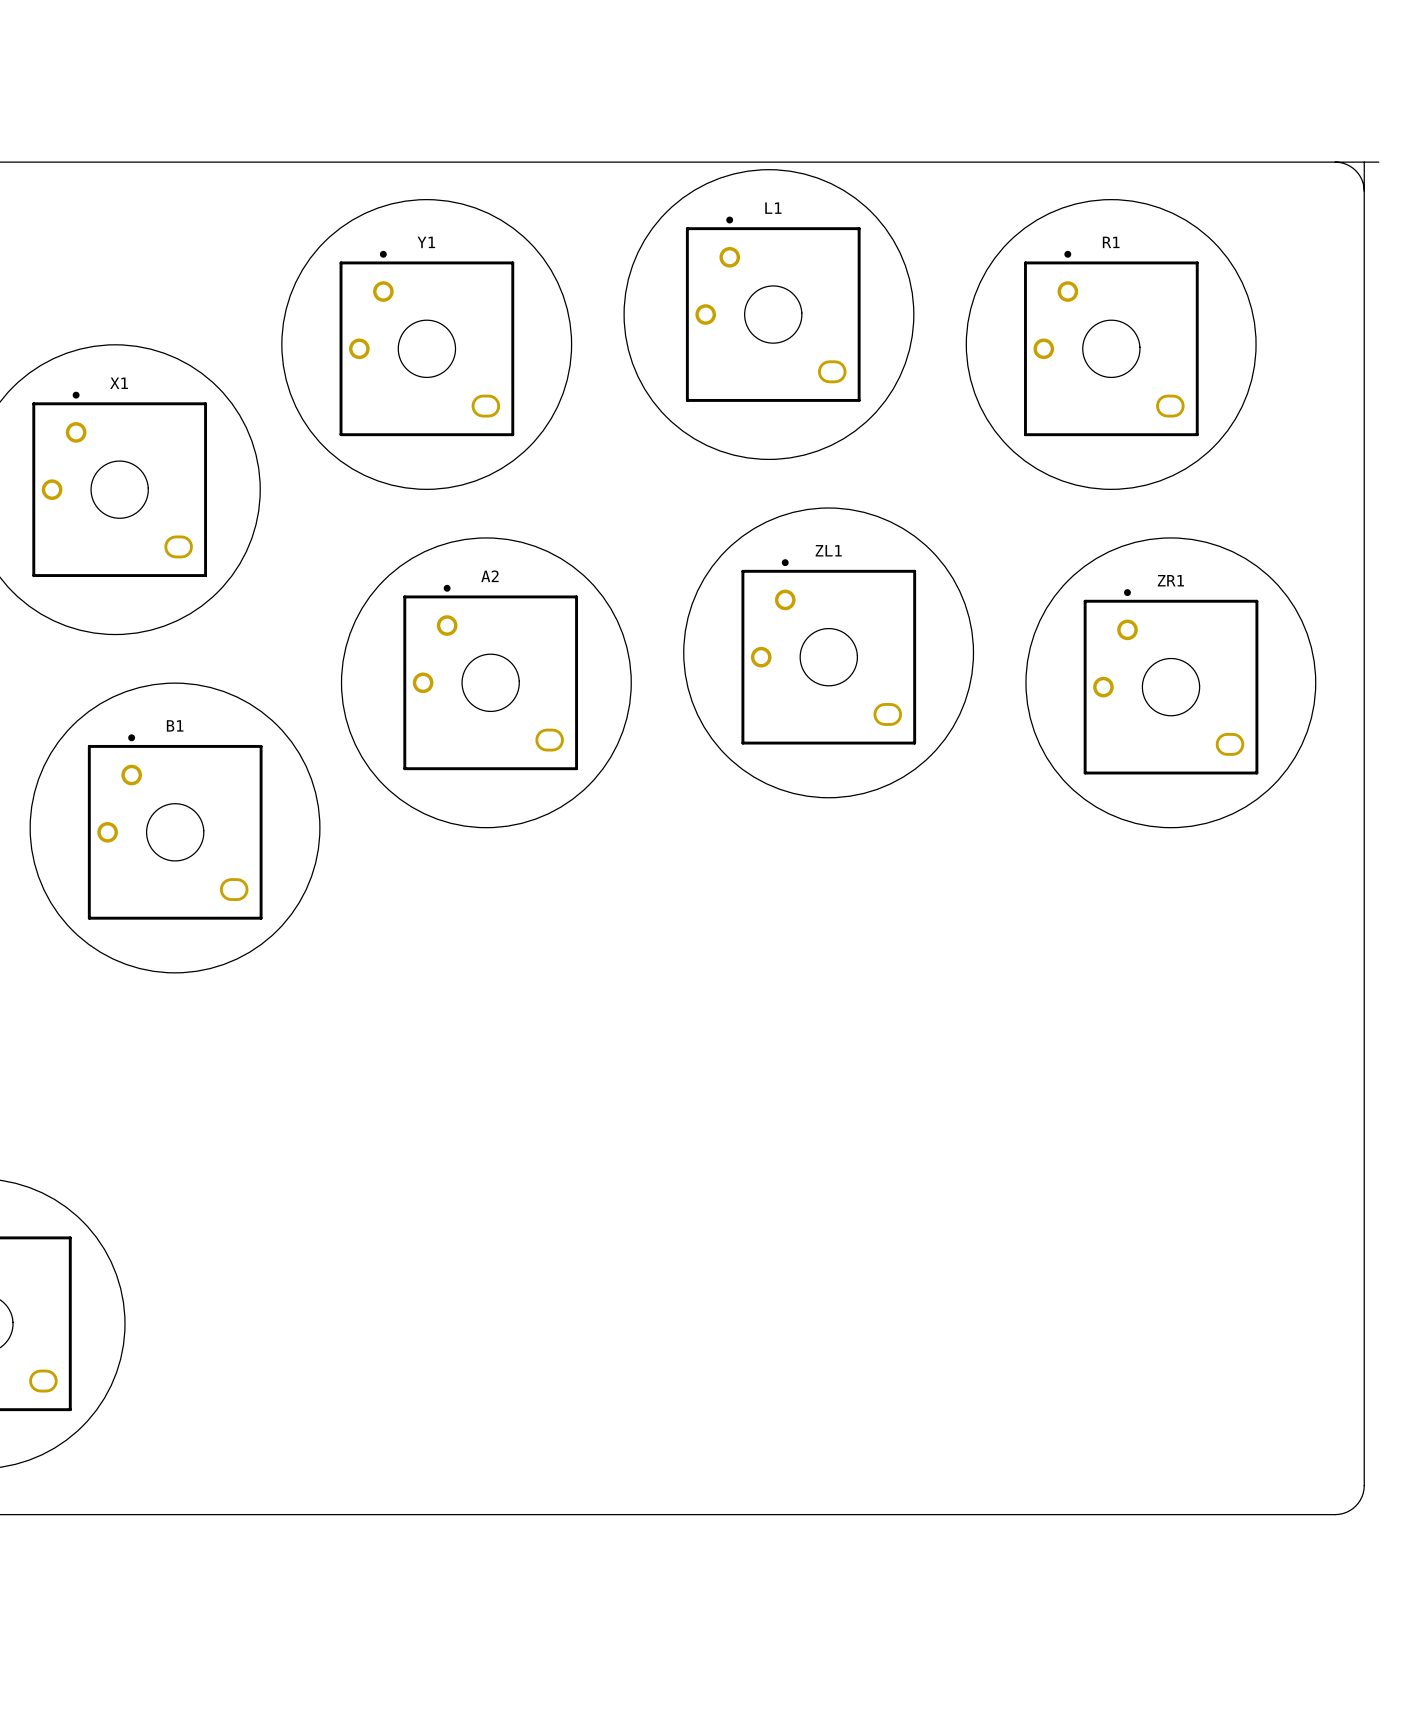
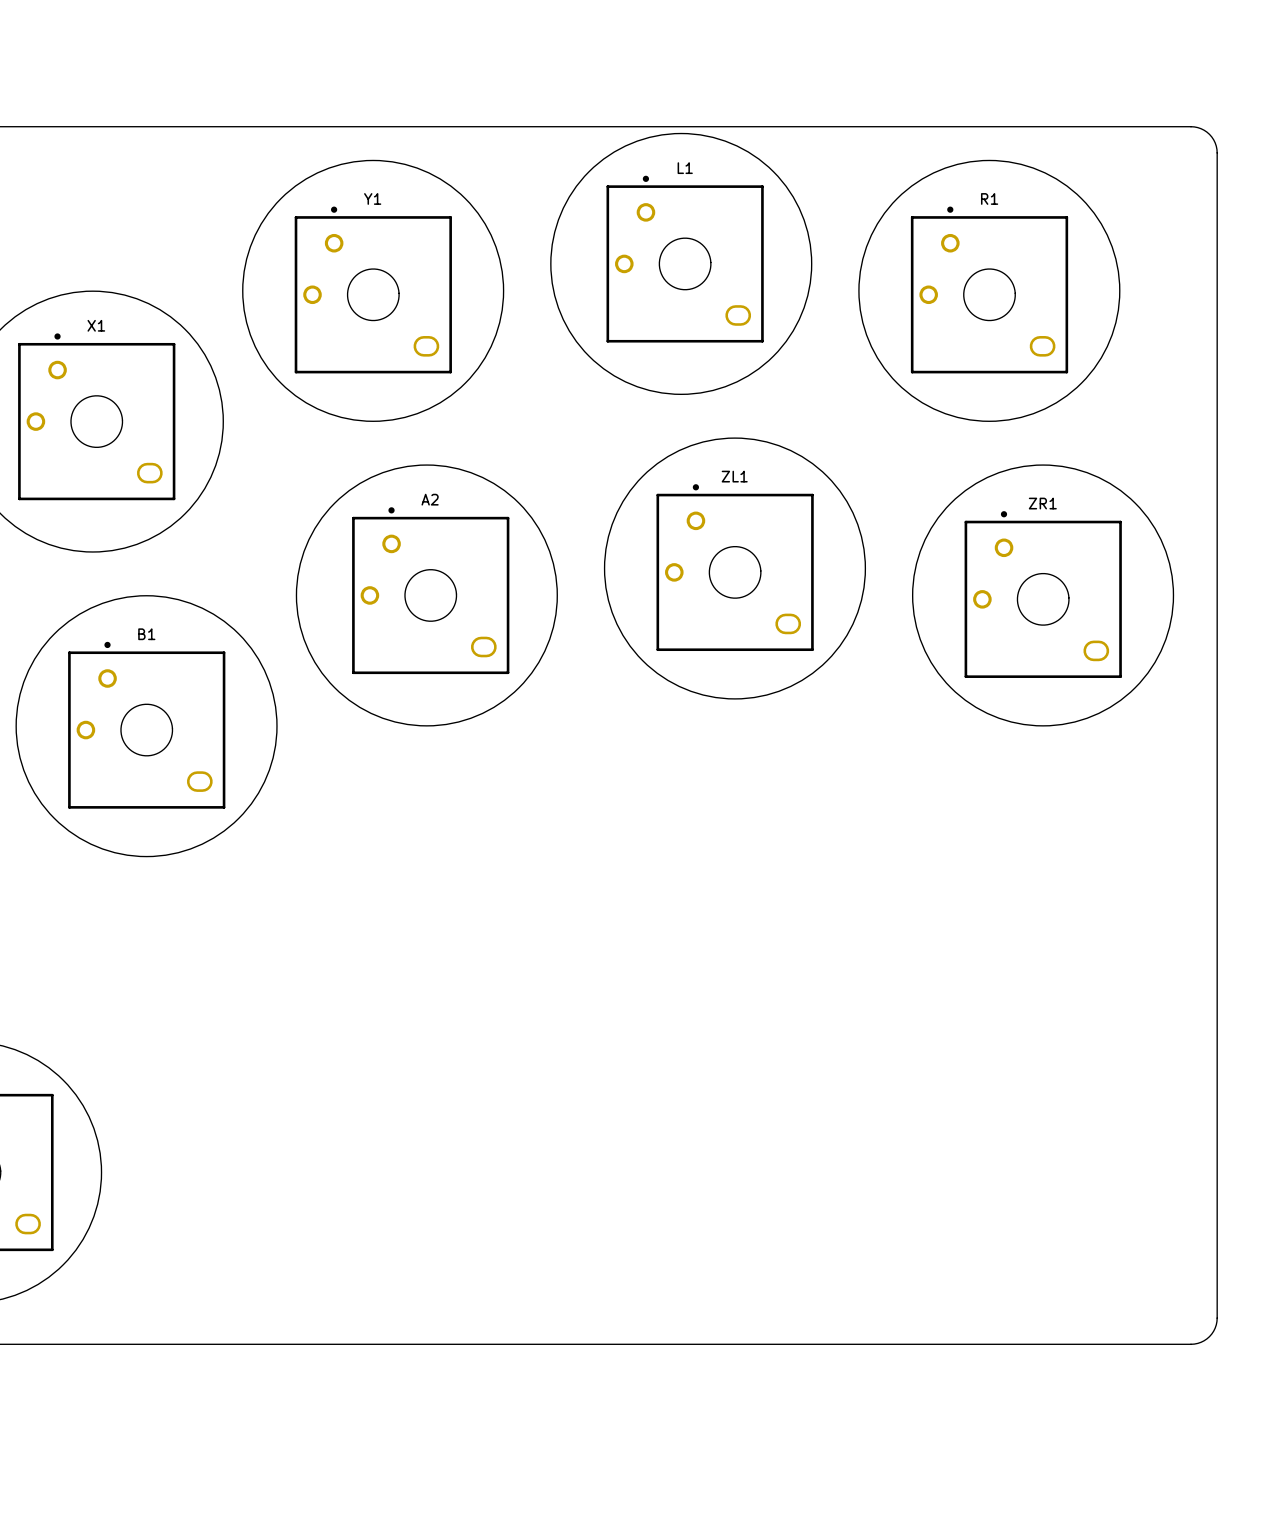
board edge: (1335, 162) (1378, 162) -> none
board edge: (1364, 162) (1364, 191) -> none

